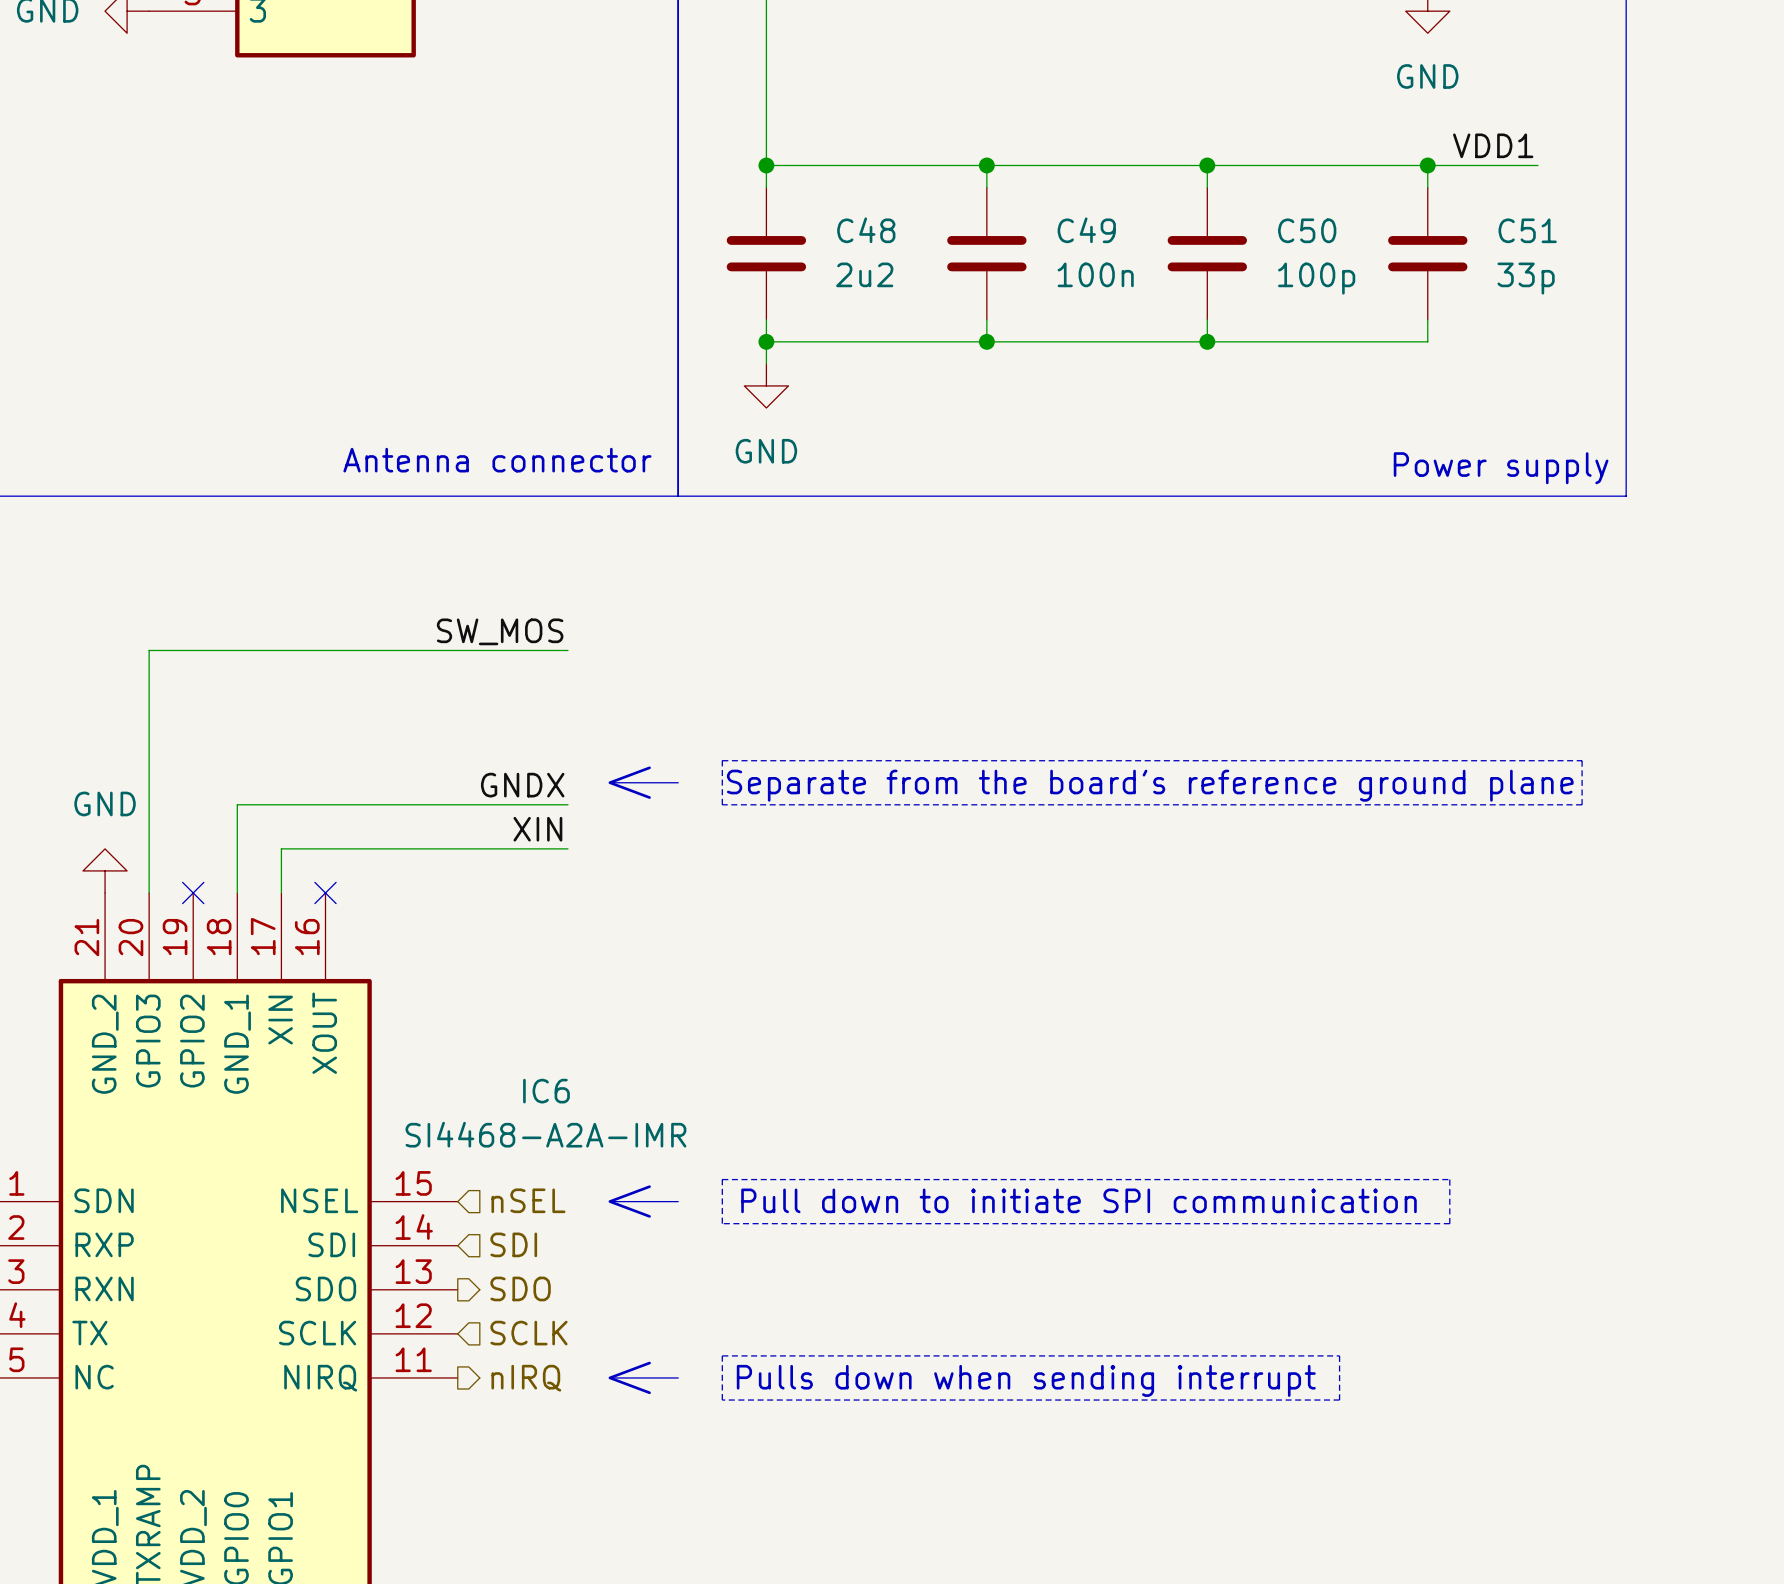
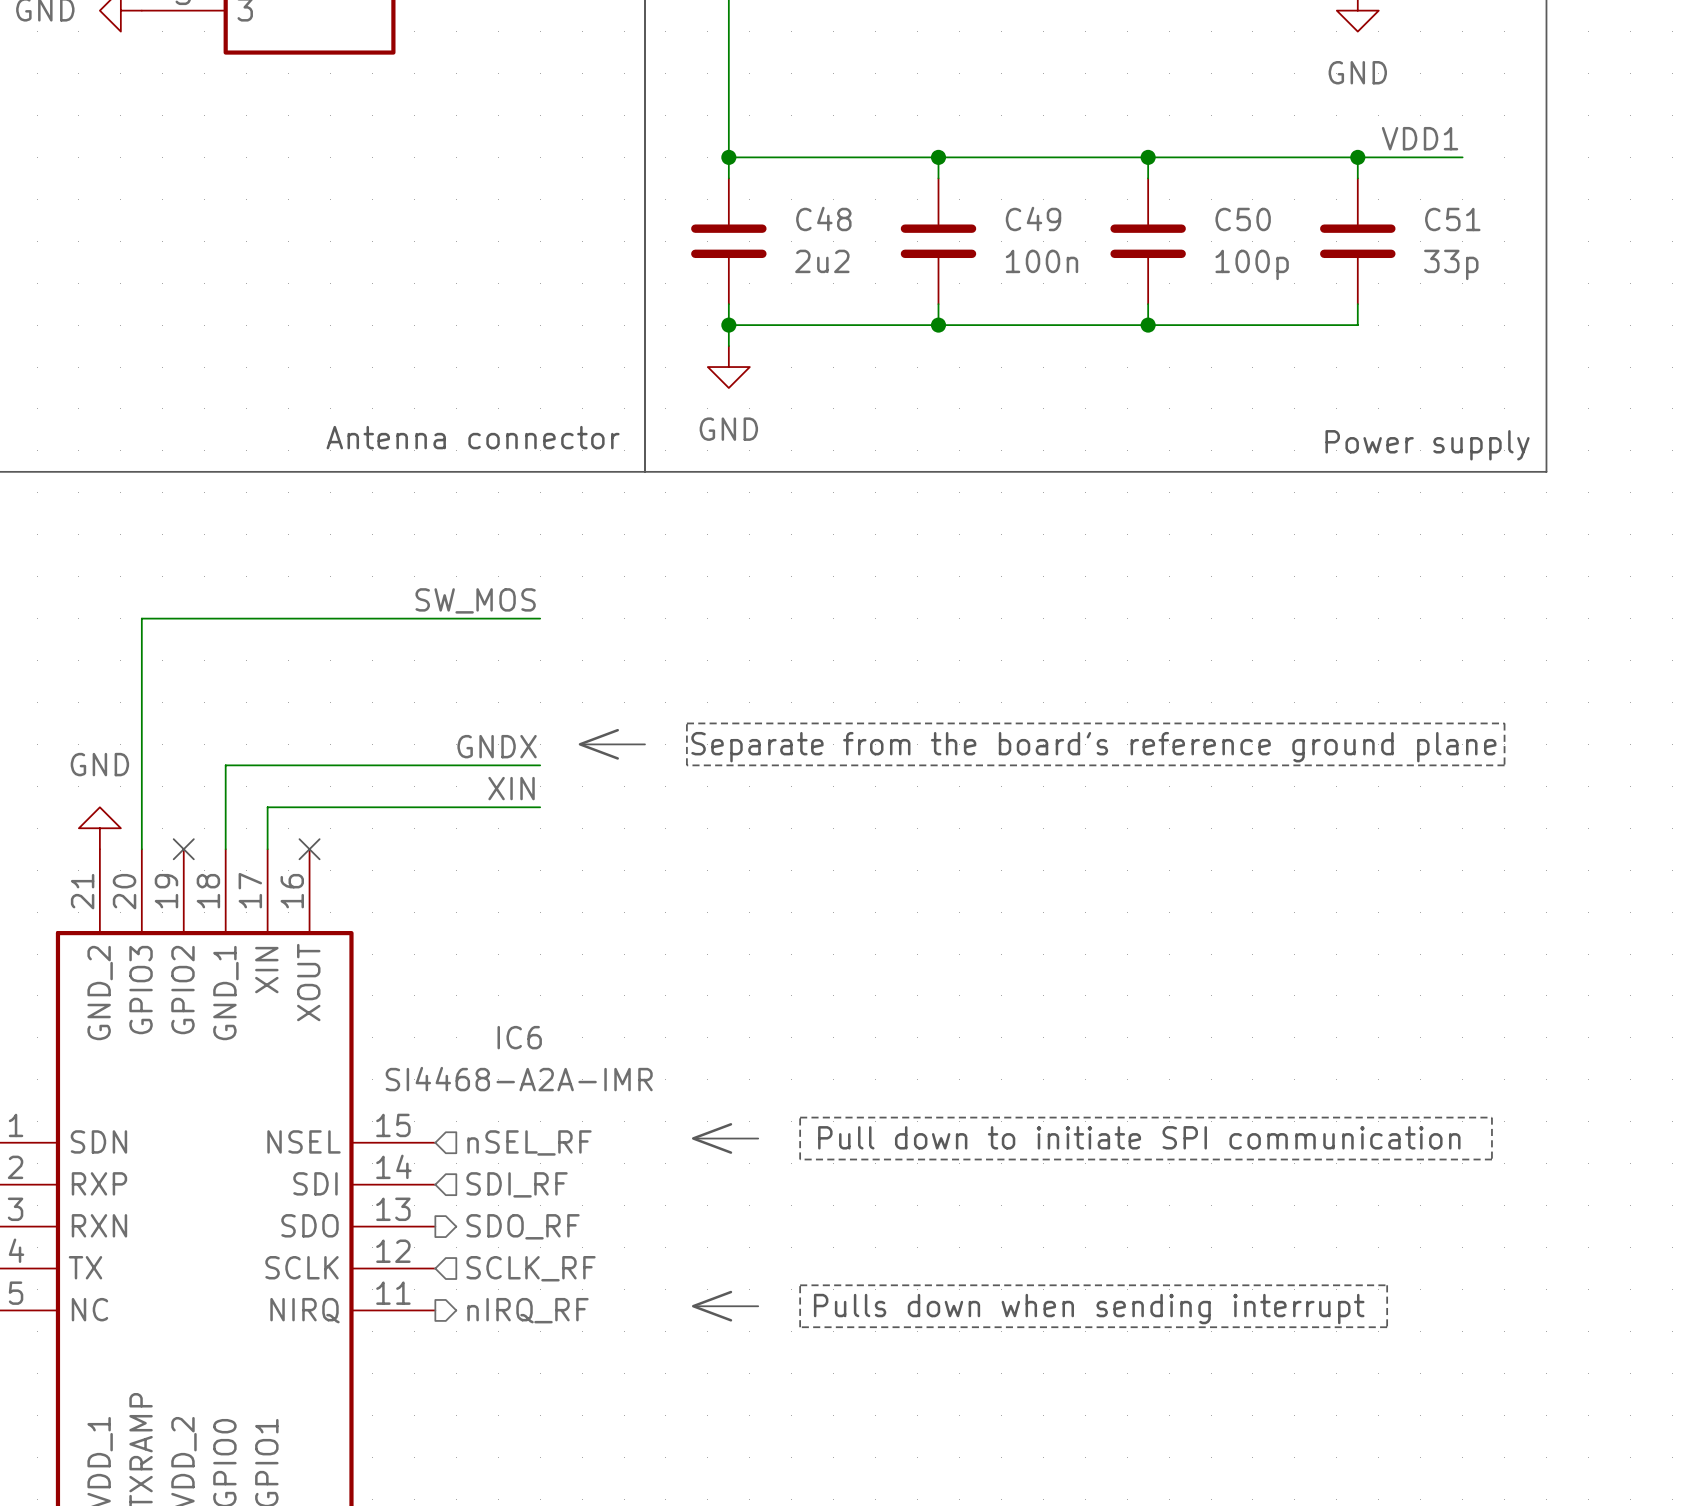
line: (722, 1179) (722, 1223) (1449, 1223) (1449, 1179) (722, 1179) -> (800, 1117) (800, 1159) (1491, 1159) (1491, 1117) (800, 1117)
text: none -> < (712, 1138)
hierarchical label: nSEL (528, 1200) -> nSEL_RF (529, 1142)
text position: Pull down to initiate SPI communication (1078, 1200) -> Pull down to initiate SPI communication (1139, 1137)
line: (612, 1201) (678, 1201) -> (695, 1138) (758, 1138)
text: < (629, 1201) -> none
hierarchical label: SDI (513, 1244) -> SDI_RF (517, 1184)
hierarchical label: SDO (520, 1288) -> SDO_RF (523, 1226)
hierarchical label: SCLK (528, 1333) -> SCLK_RF (531, 1268)
line: (722, 1355) (1339, 1355) (1339, 1400) (722, 1400) (722, 1355) -> (800, 1285) (1387, 1285) (1387, 1327) (800, 1327) (800, 1285)
text: none -> < (712, 1306)
line: (612, 1377) (678, 1377) -> (695, 1306) (758, 1306)
text: < (629, 1377) -> none
hierarchical label: nIRQ (526, 1378) -> nIRQ_RF (528, 1310)
text position: Pulls down when sending interrupt (1026, 1380) -> Pulls down when sending interrupt (1089, 1309)

